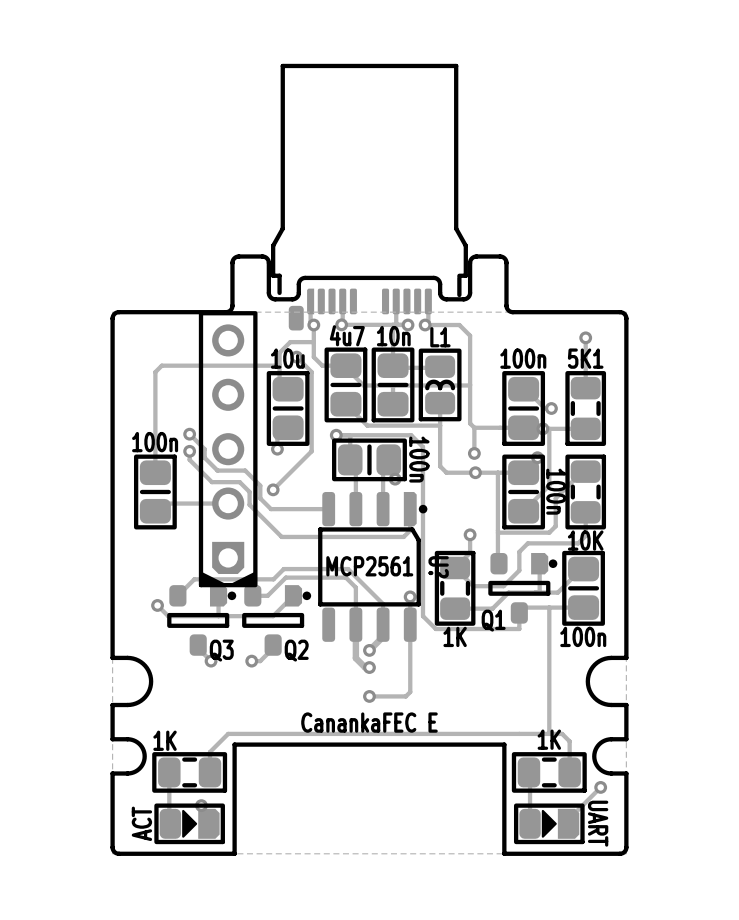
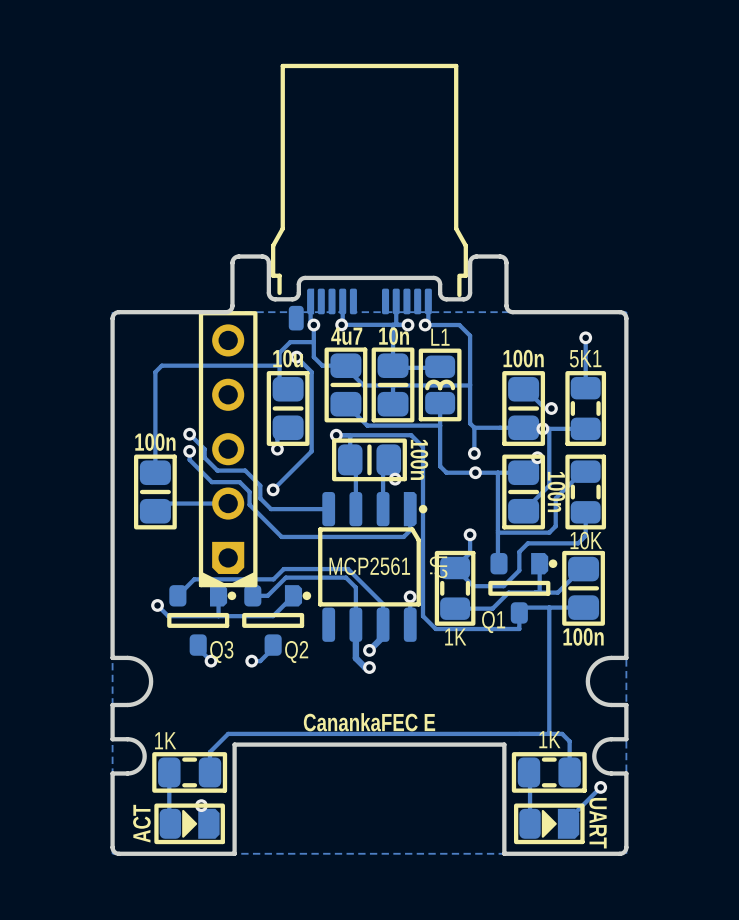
track: (410, 624) (410, 692) (405, 696) (369, 696) -> none
via: (369, 696) -> none

